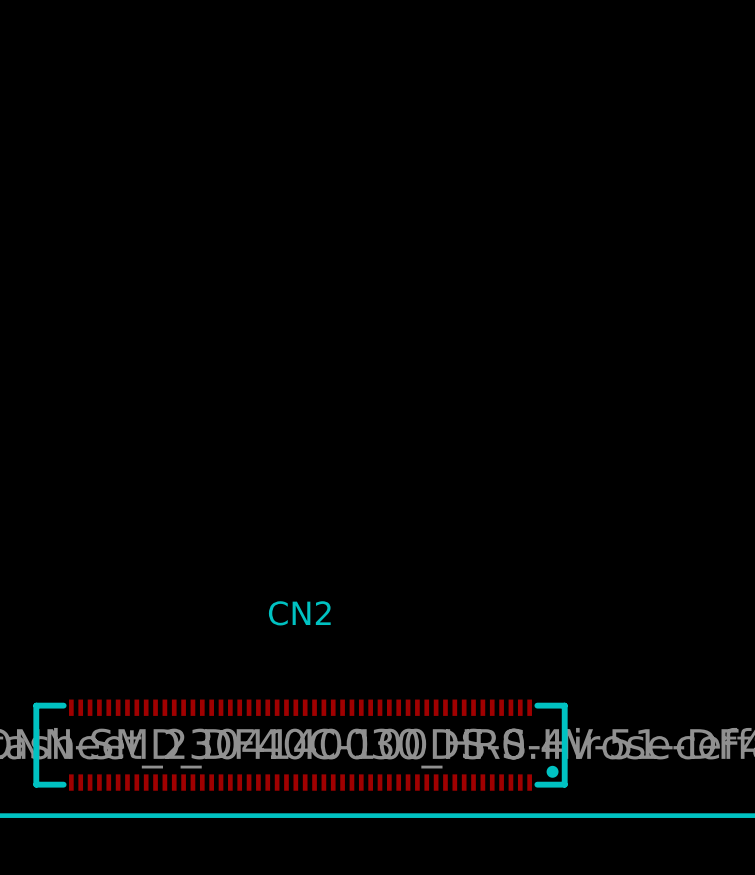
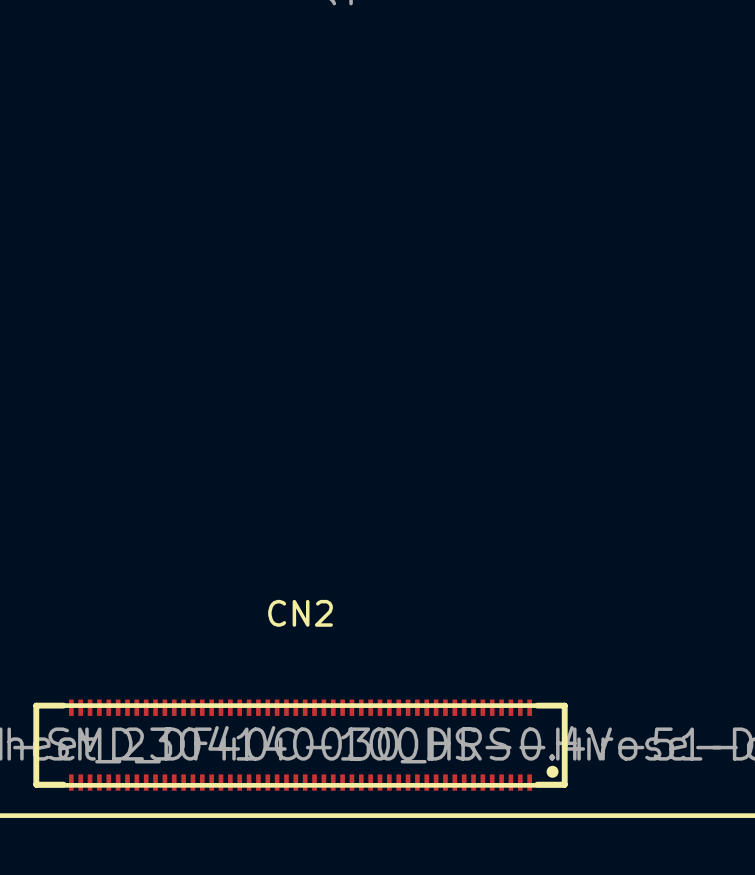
line: none -> (36, 705) (36, 785) (564, 785) (564, 705) (36, 705)

